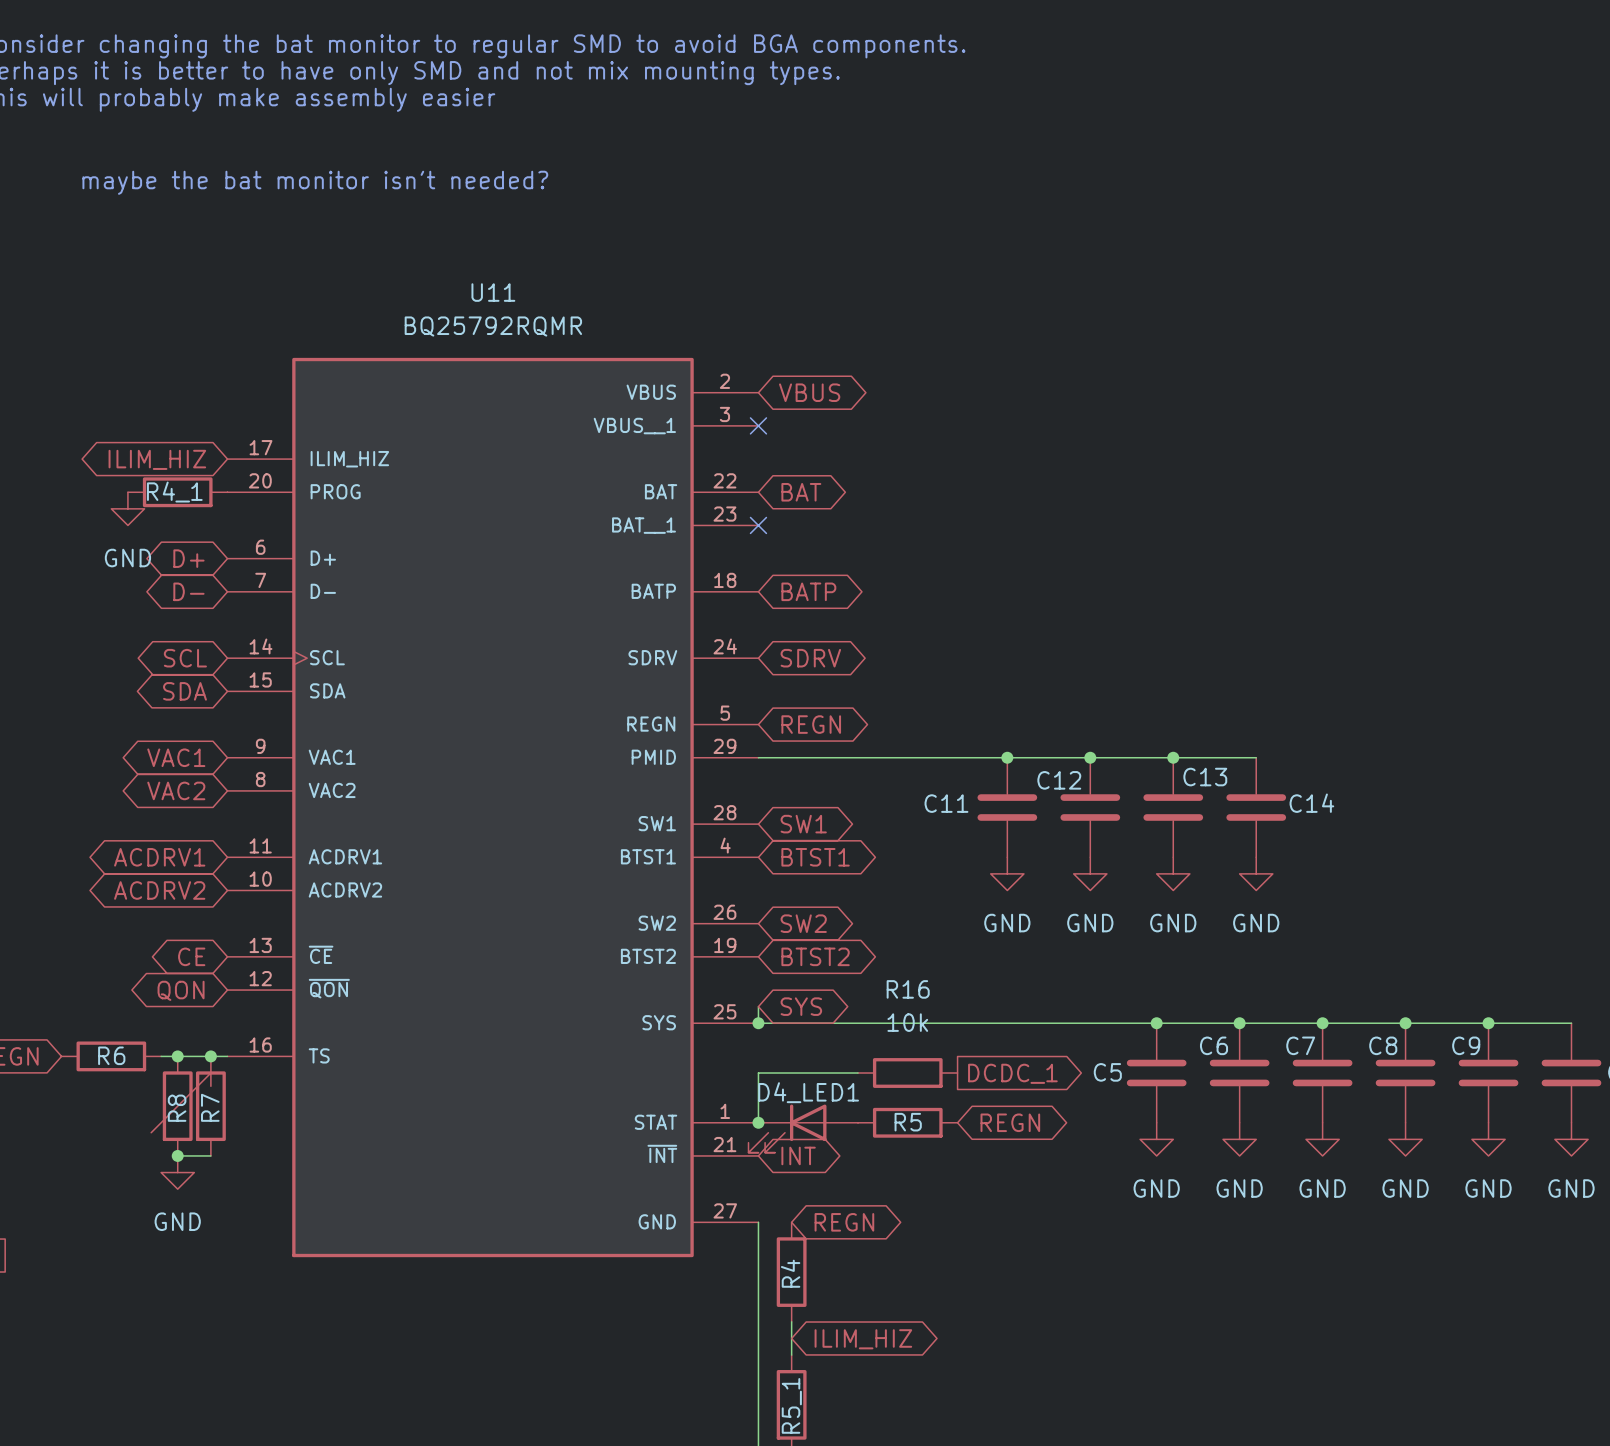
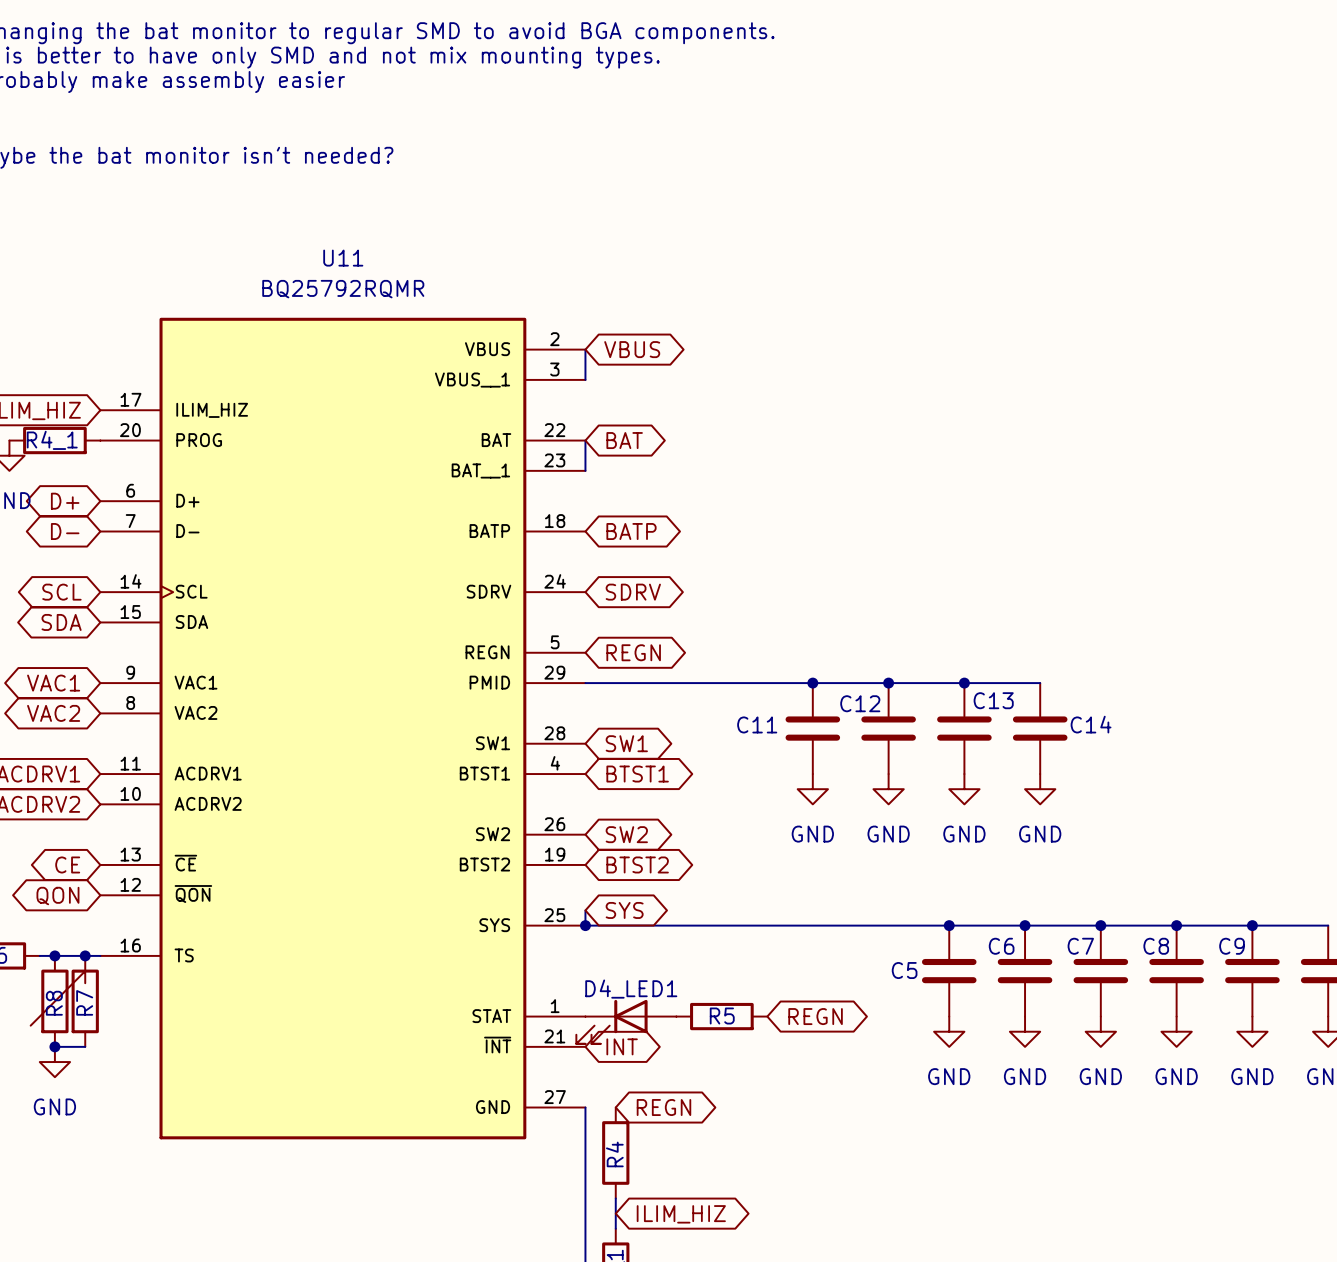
wire: none -> (585, 349) (585, 379)
no-connect mark: (758, 425) -> none
wire: none -> (585, 440) (585, 470)
no-connect mark: (758, 525) -> none
wire: (858, 1073) (758, 1073) (758, 1122) -> none
R16: 10k (907, 1073) -> none
global label: DCDC_1 (1012, 1073) -> none
junction: (758, 1122) -> none

